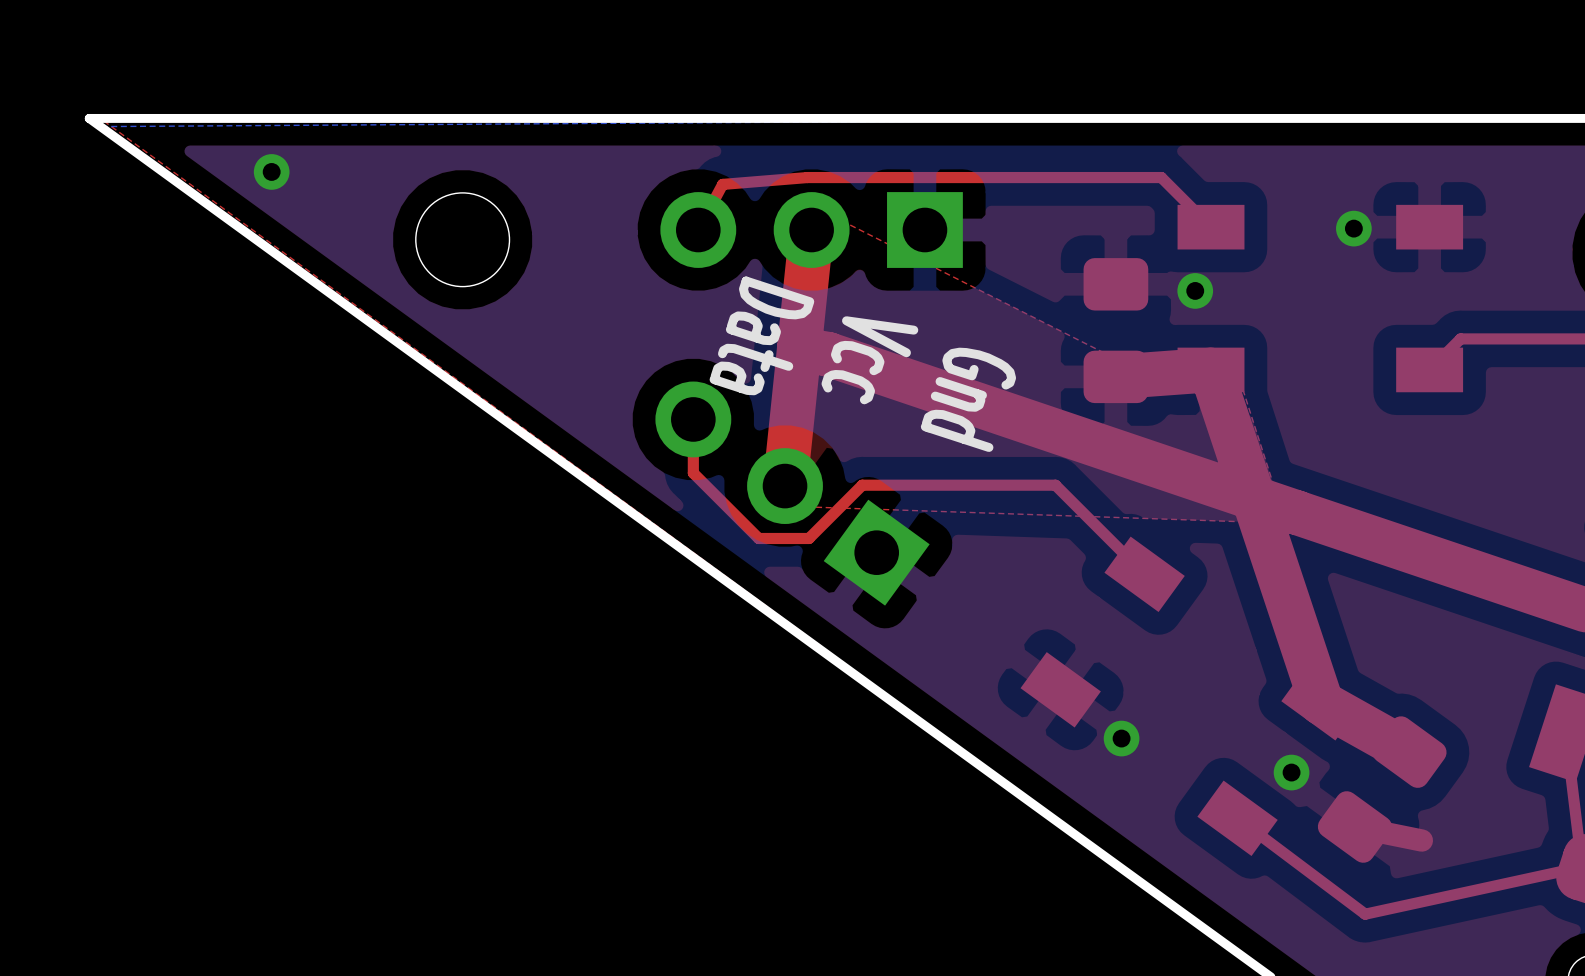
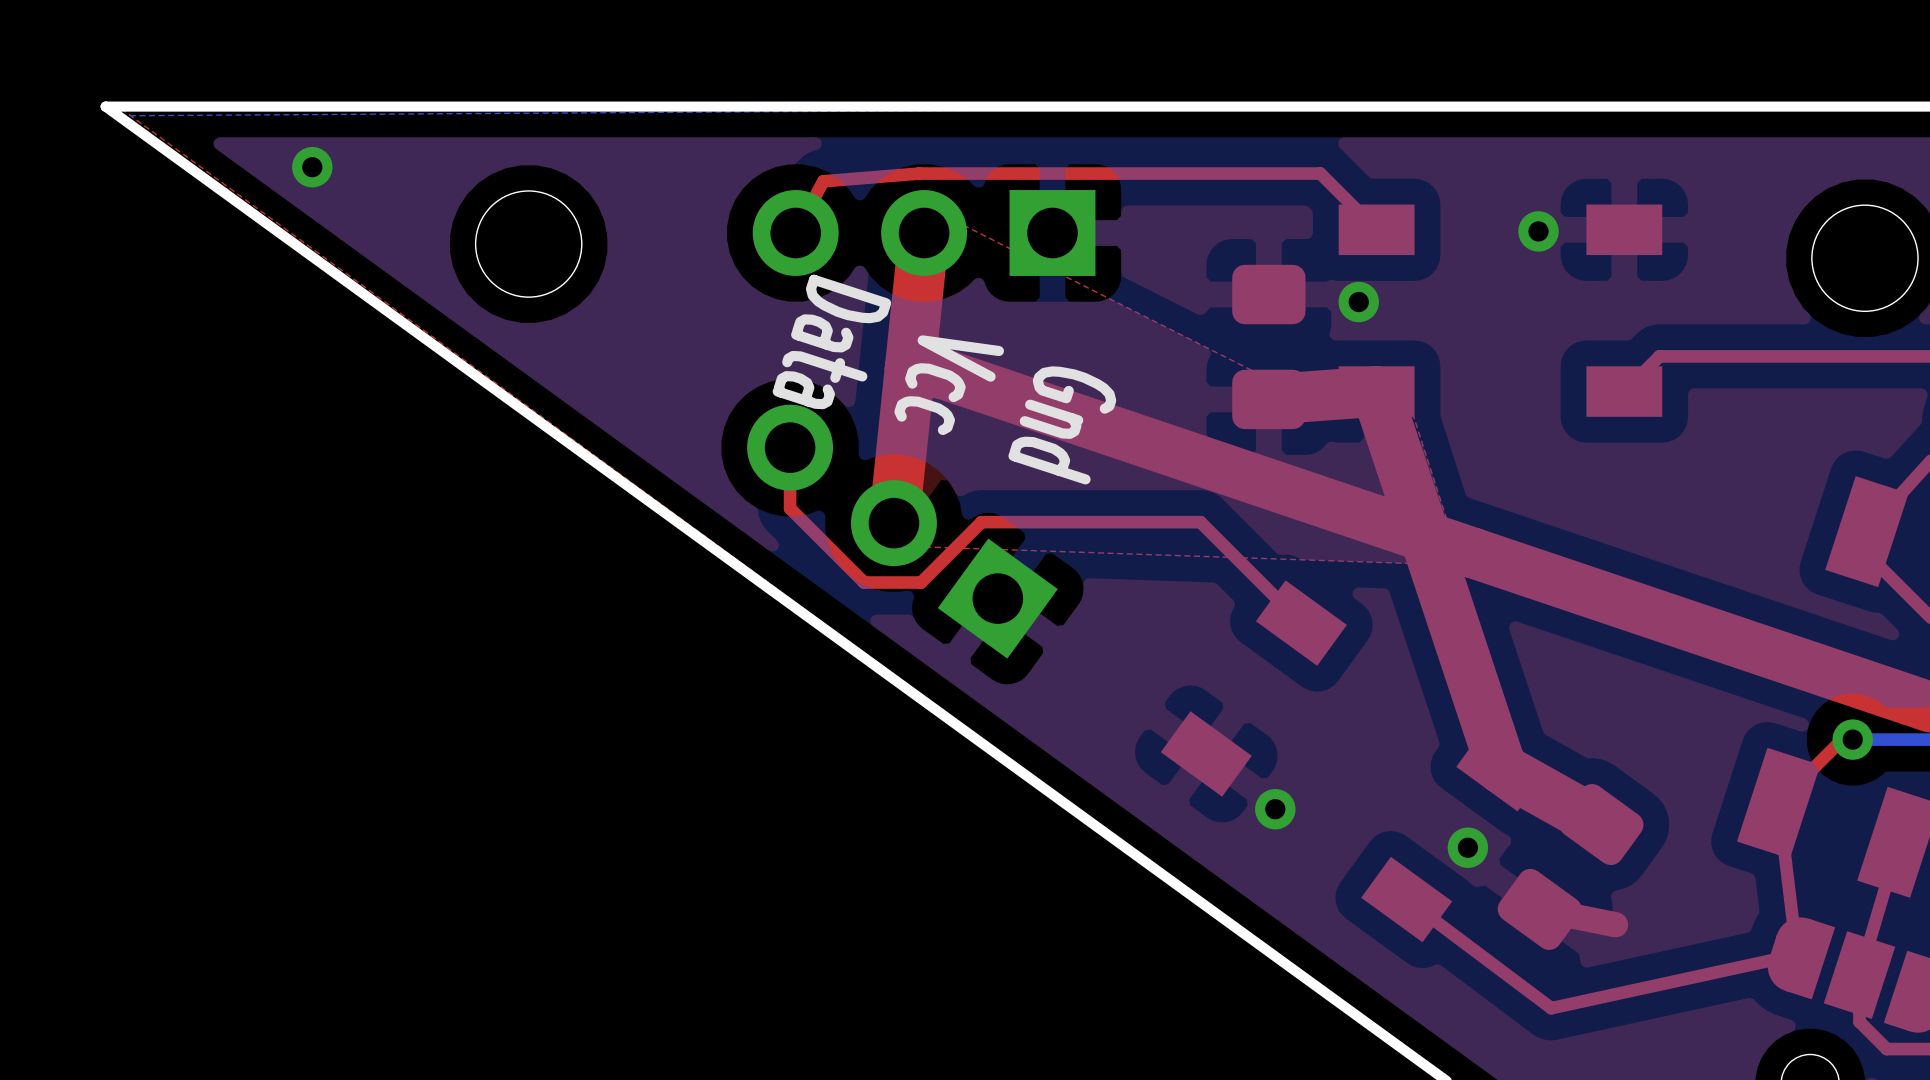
text position: Data (761, 335) -> Data (831, 341)
text position: Vcc (869, 360) -> Vcc (949, 385)
text position: Gnd (968, 399) -> Gnd (1062, 425)

